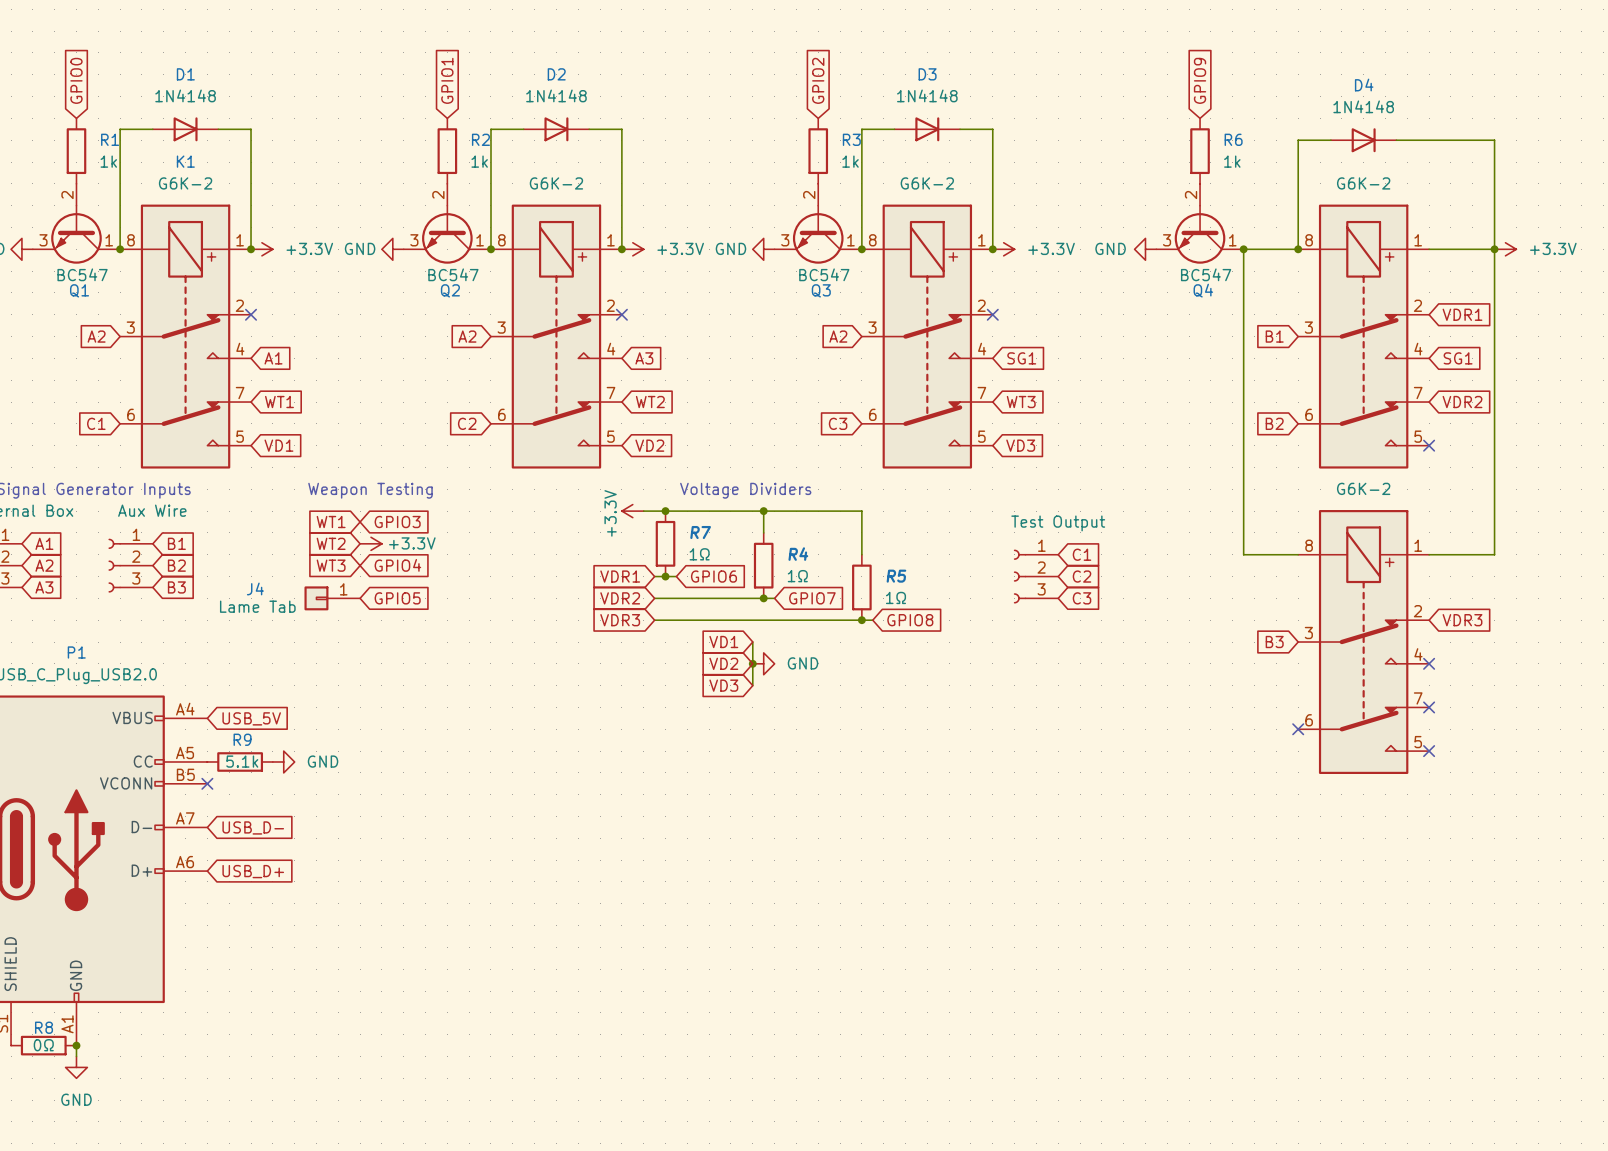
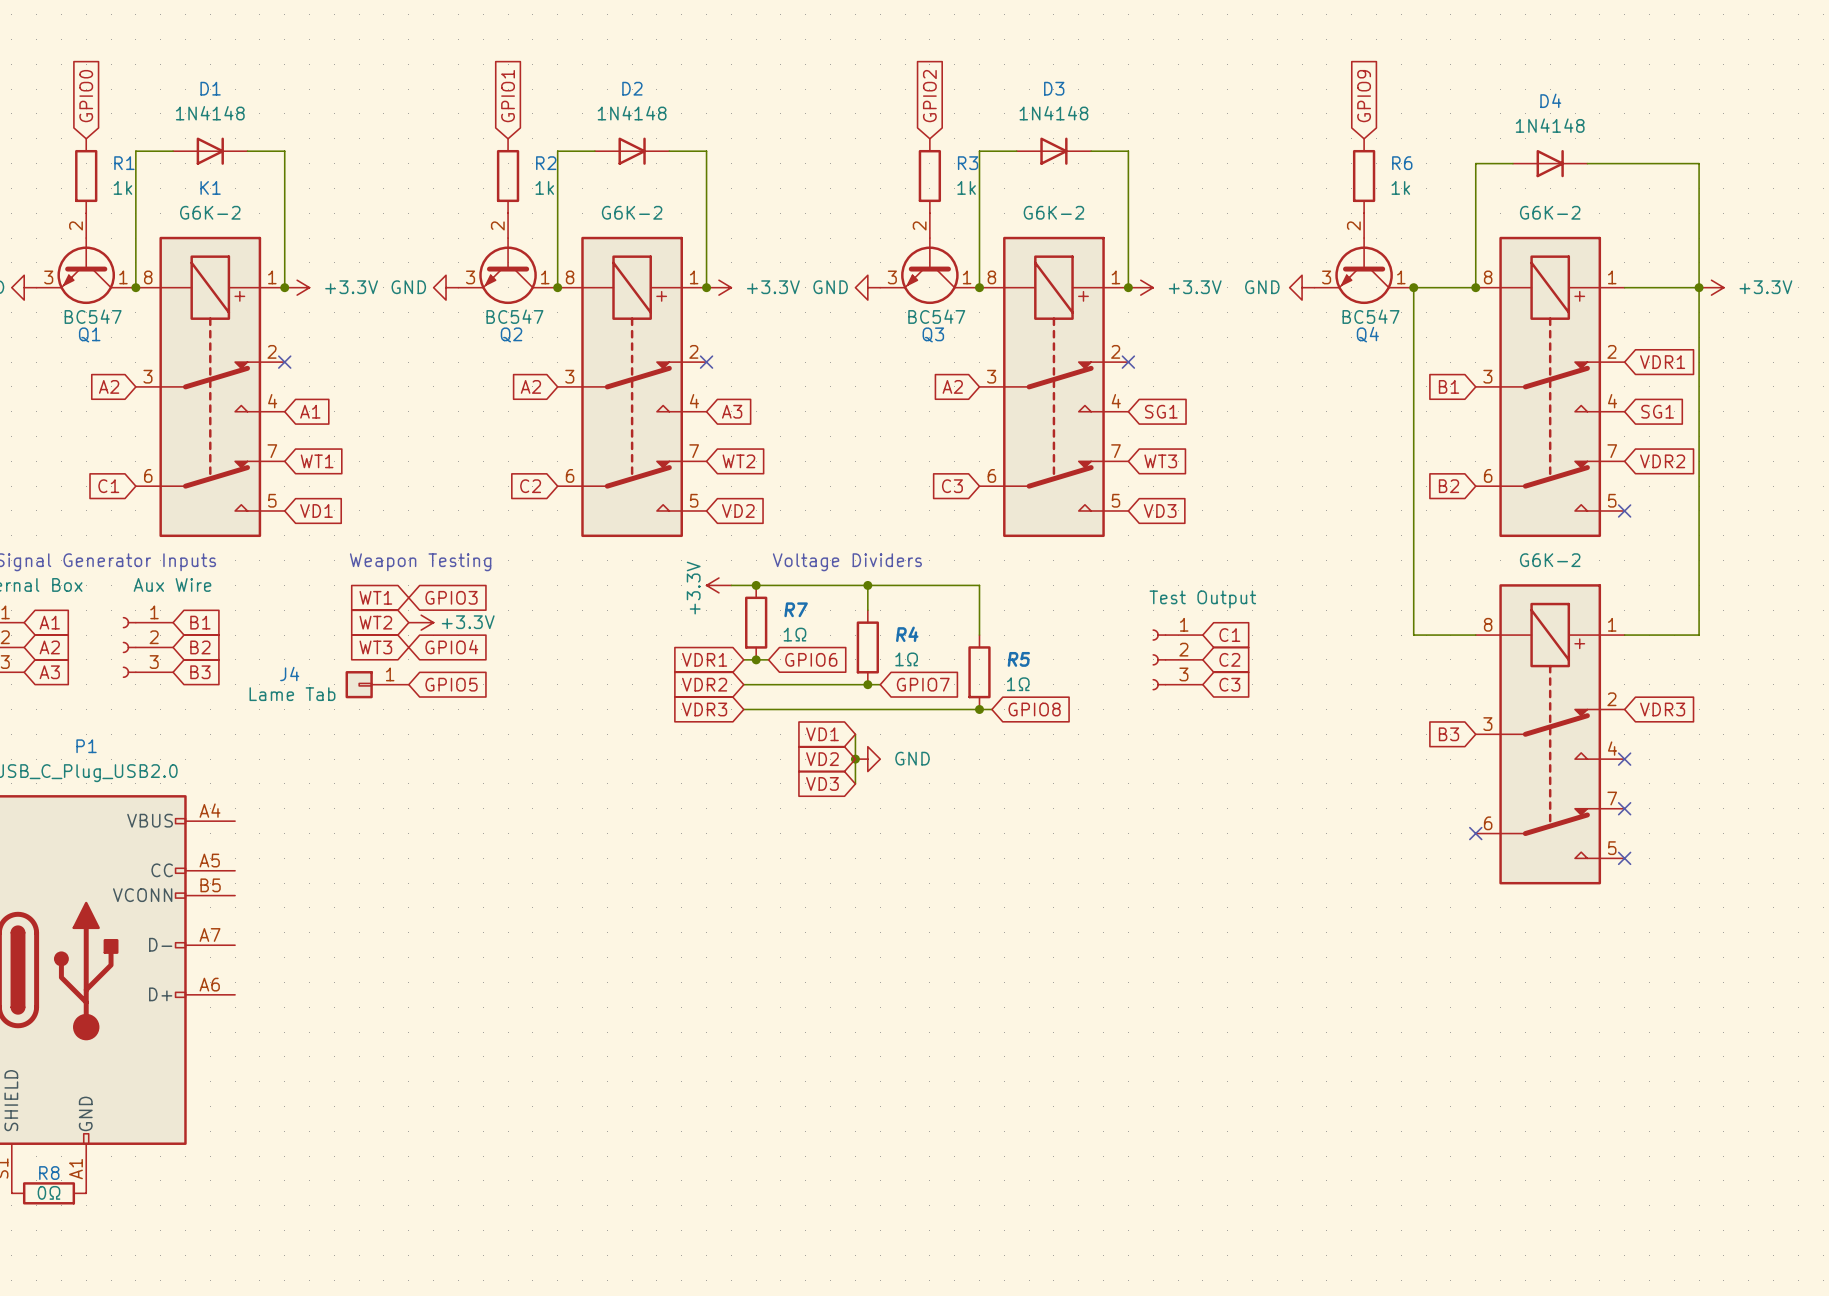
global label: USB_5V (251, 718) -> none
R9: 5.1k (240, 761) -> none
power symbol: GND (283, 761) -> none
no-connect mark: (207, 783) -> none
global label: USB_D- (253, 827) -> none
global label: USB_D+ (253, 871) -> none
wire: (76, 1045) (76, 1056) -> none
junction: (76, 1045) -> none
power symbol: GND (76, 1067) -> none

